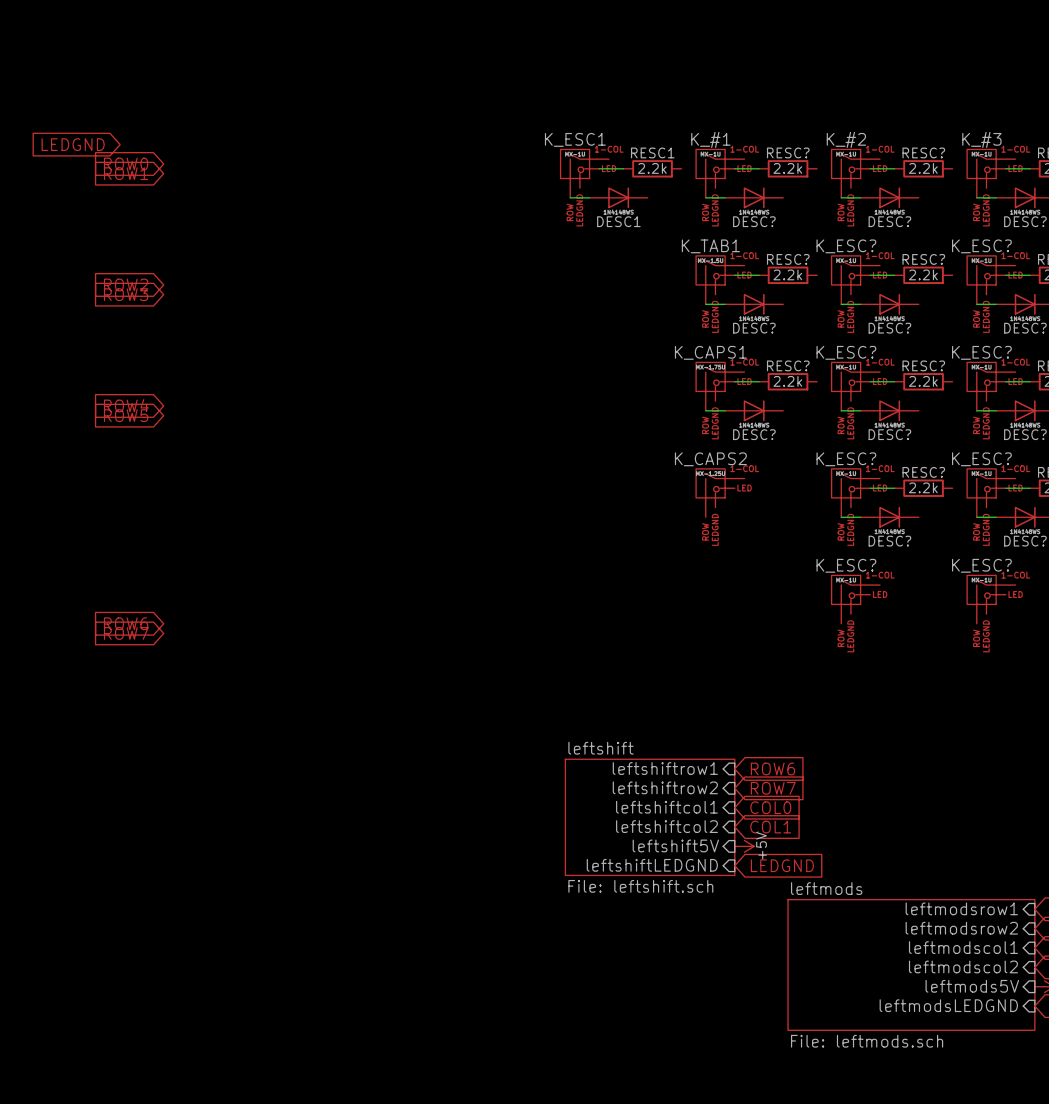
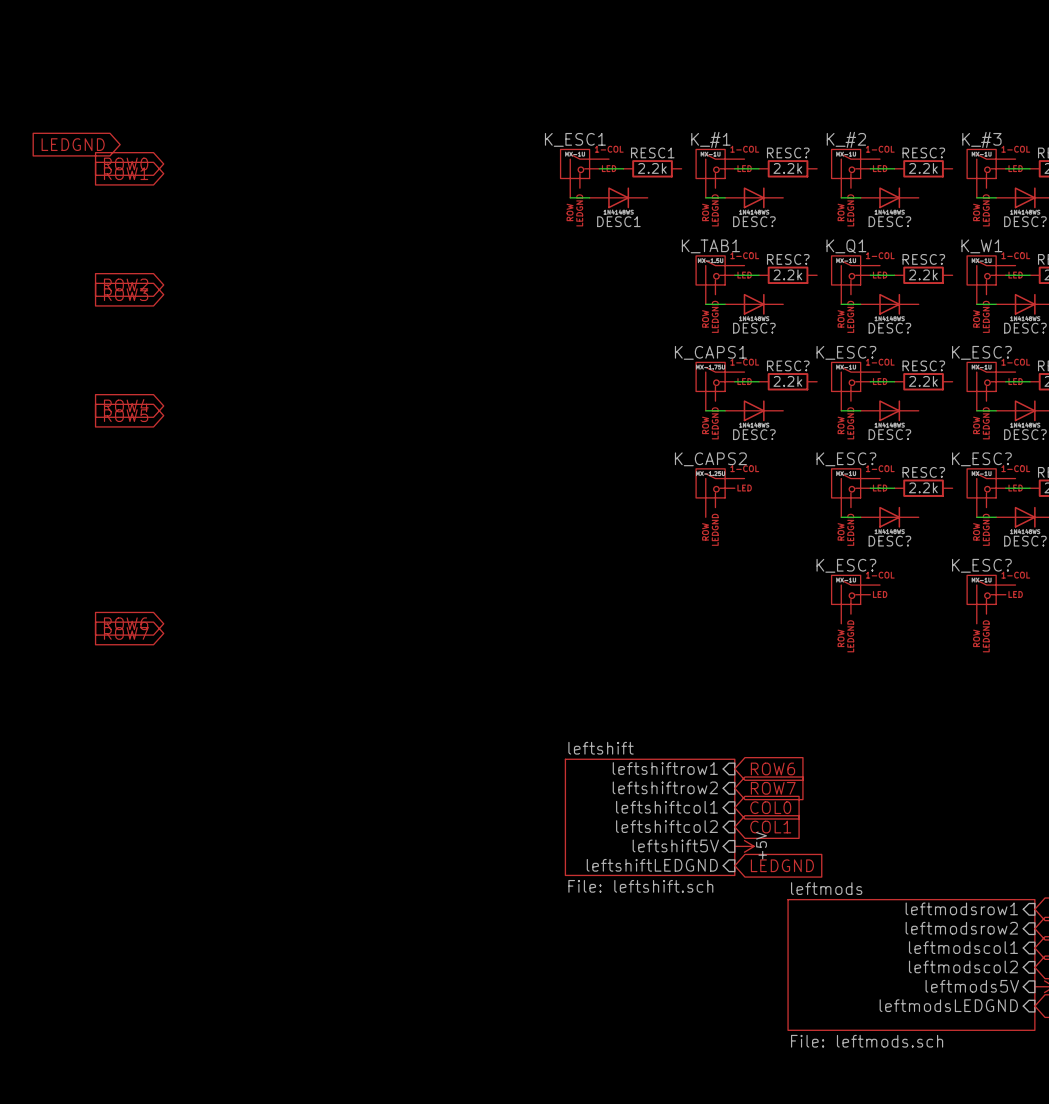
K_ESC? name: K_ESC? (846, 246) -> K_Q1 (846, 246)
K_ESC? name: K_ESC? (981, 246) -> K_W1 (981, 246)

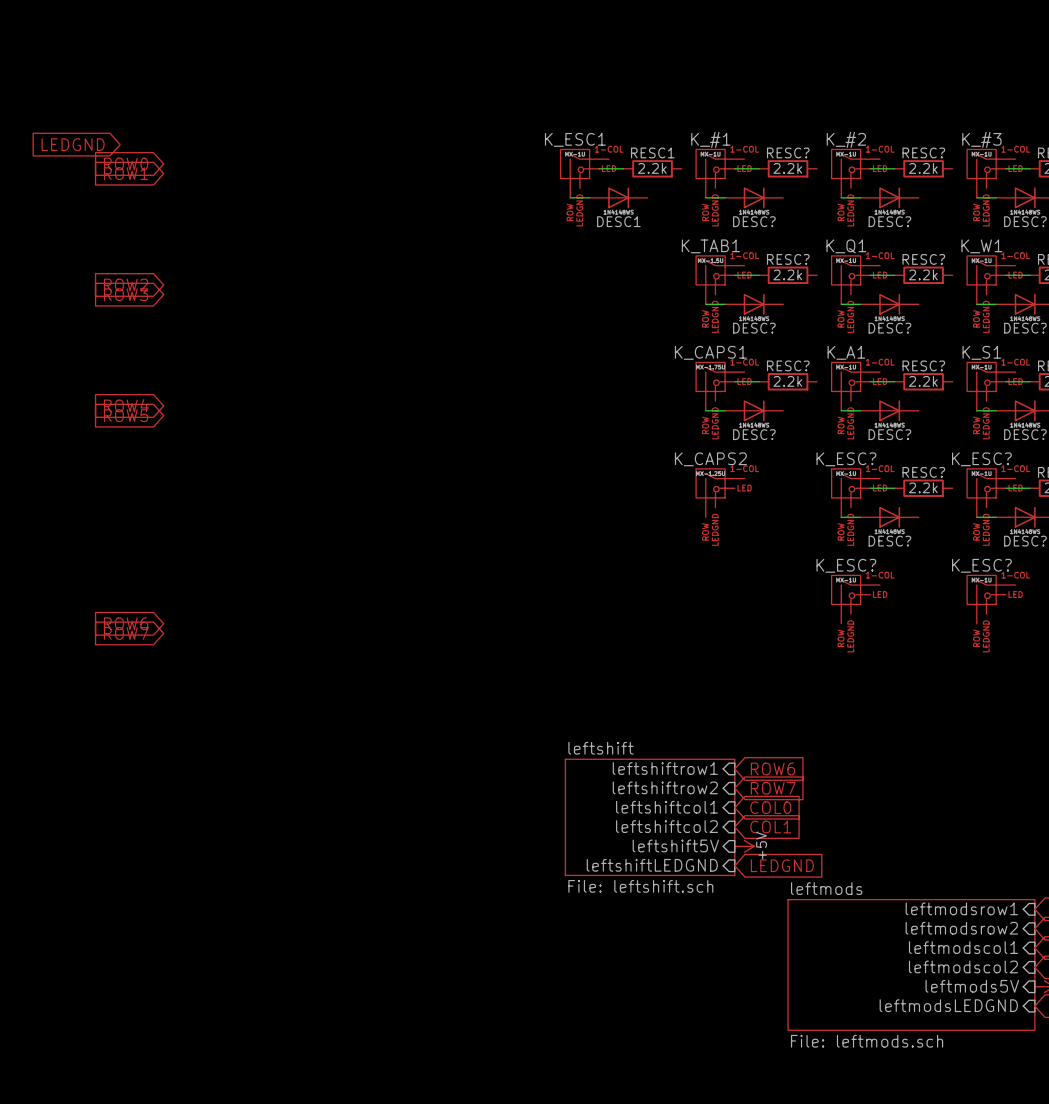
K_ESC? name: K_ESC? (846, 352) -> K_A1 (846, 352)
K_ESC? name: K_ESC? (981, 352) -> K_S1 (981, 352)

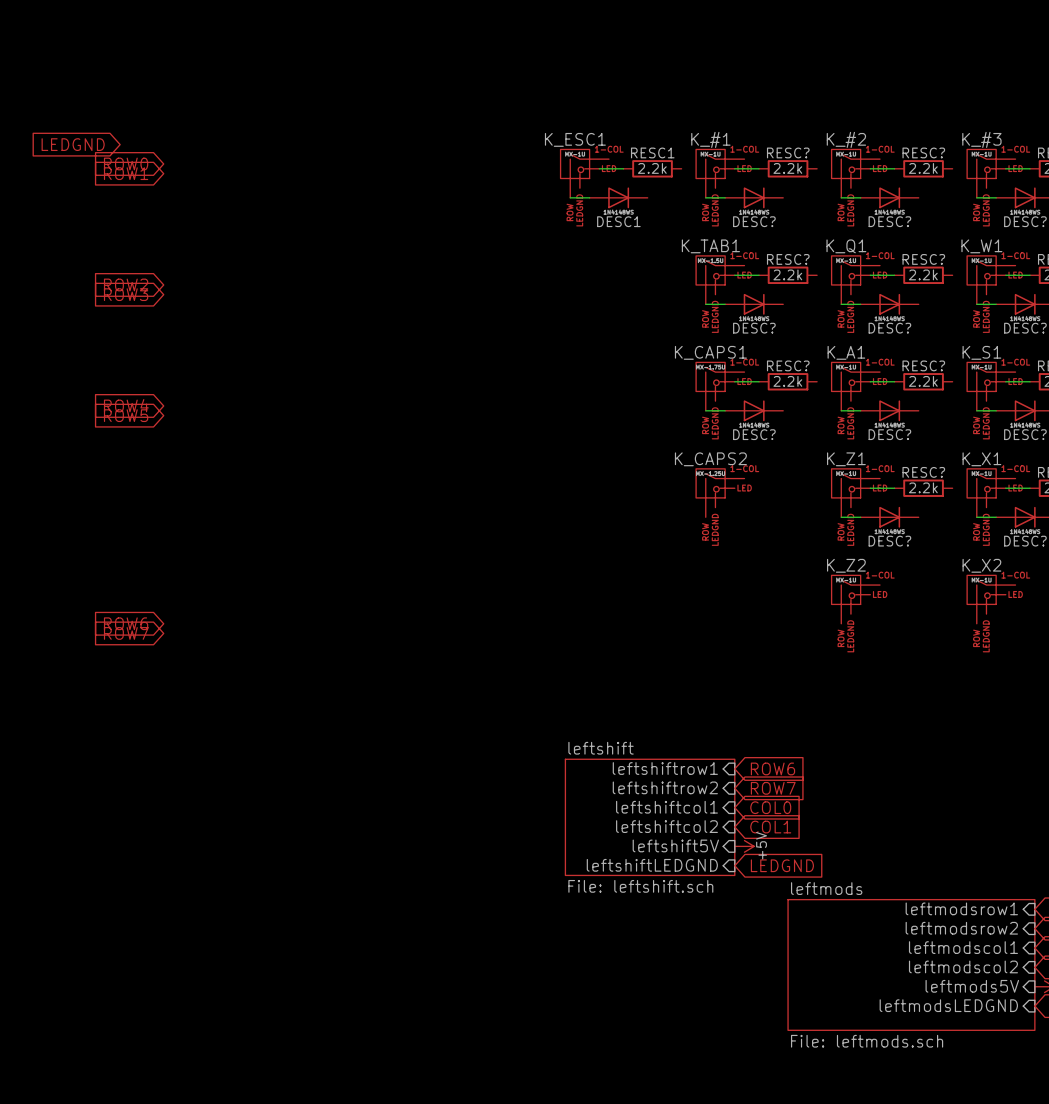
K_ESC? name: K_ESC? (846, 459) -> K_Z1 (846, 459)
K_ESC? name: K_ESC? (981, 459) -> K_X1 (981, 459)
K_ESC? name: K_ESC? (846, 565) -> K_Z2 (846, 565)
K_ESC? name: K_ESC? (981, 565) -> K_X2 (981, 565)

